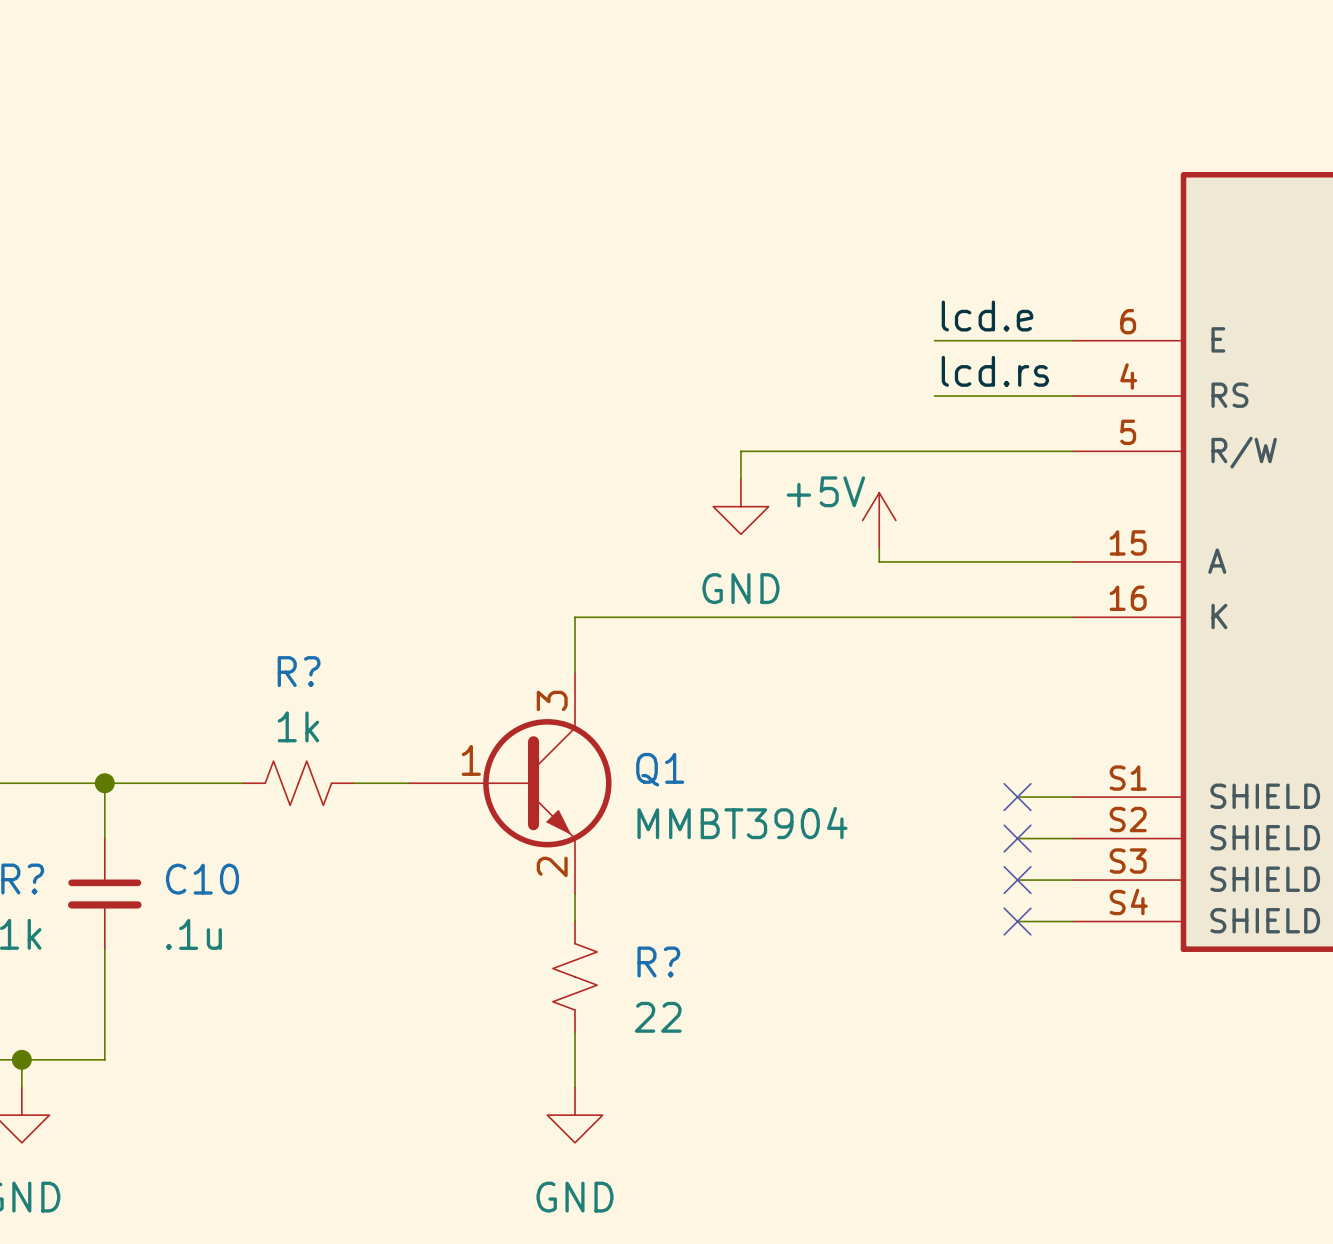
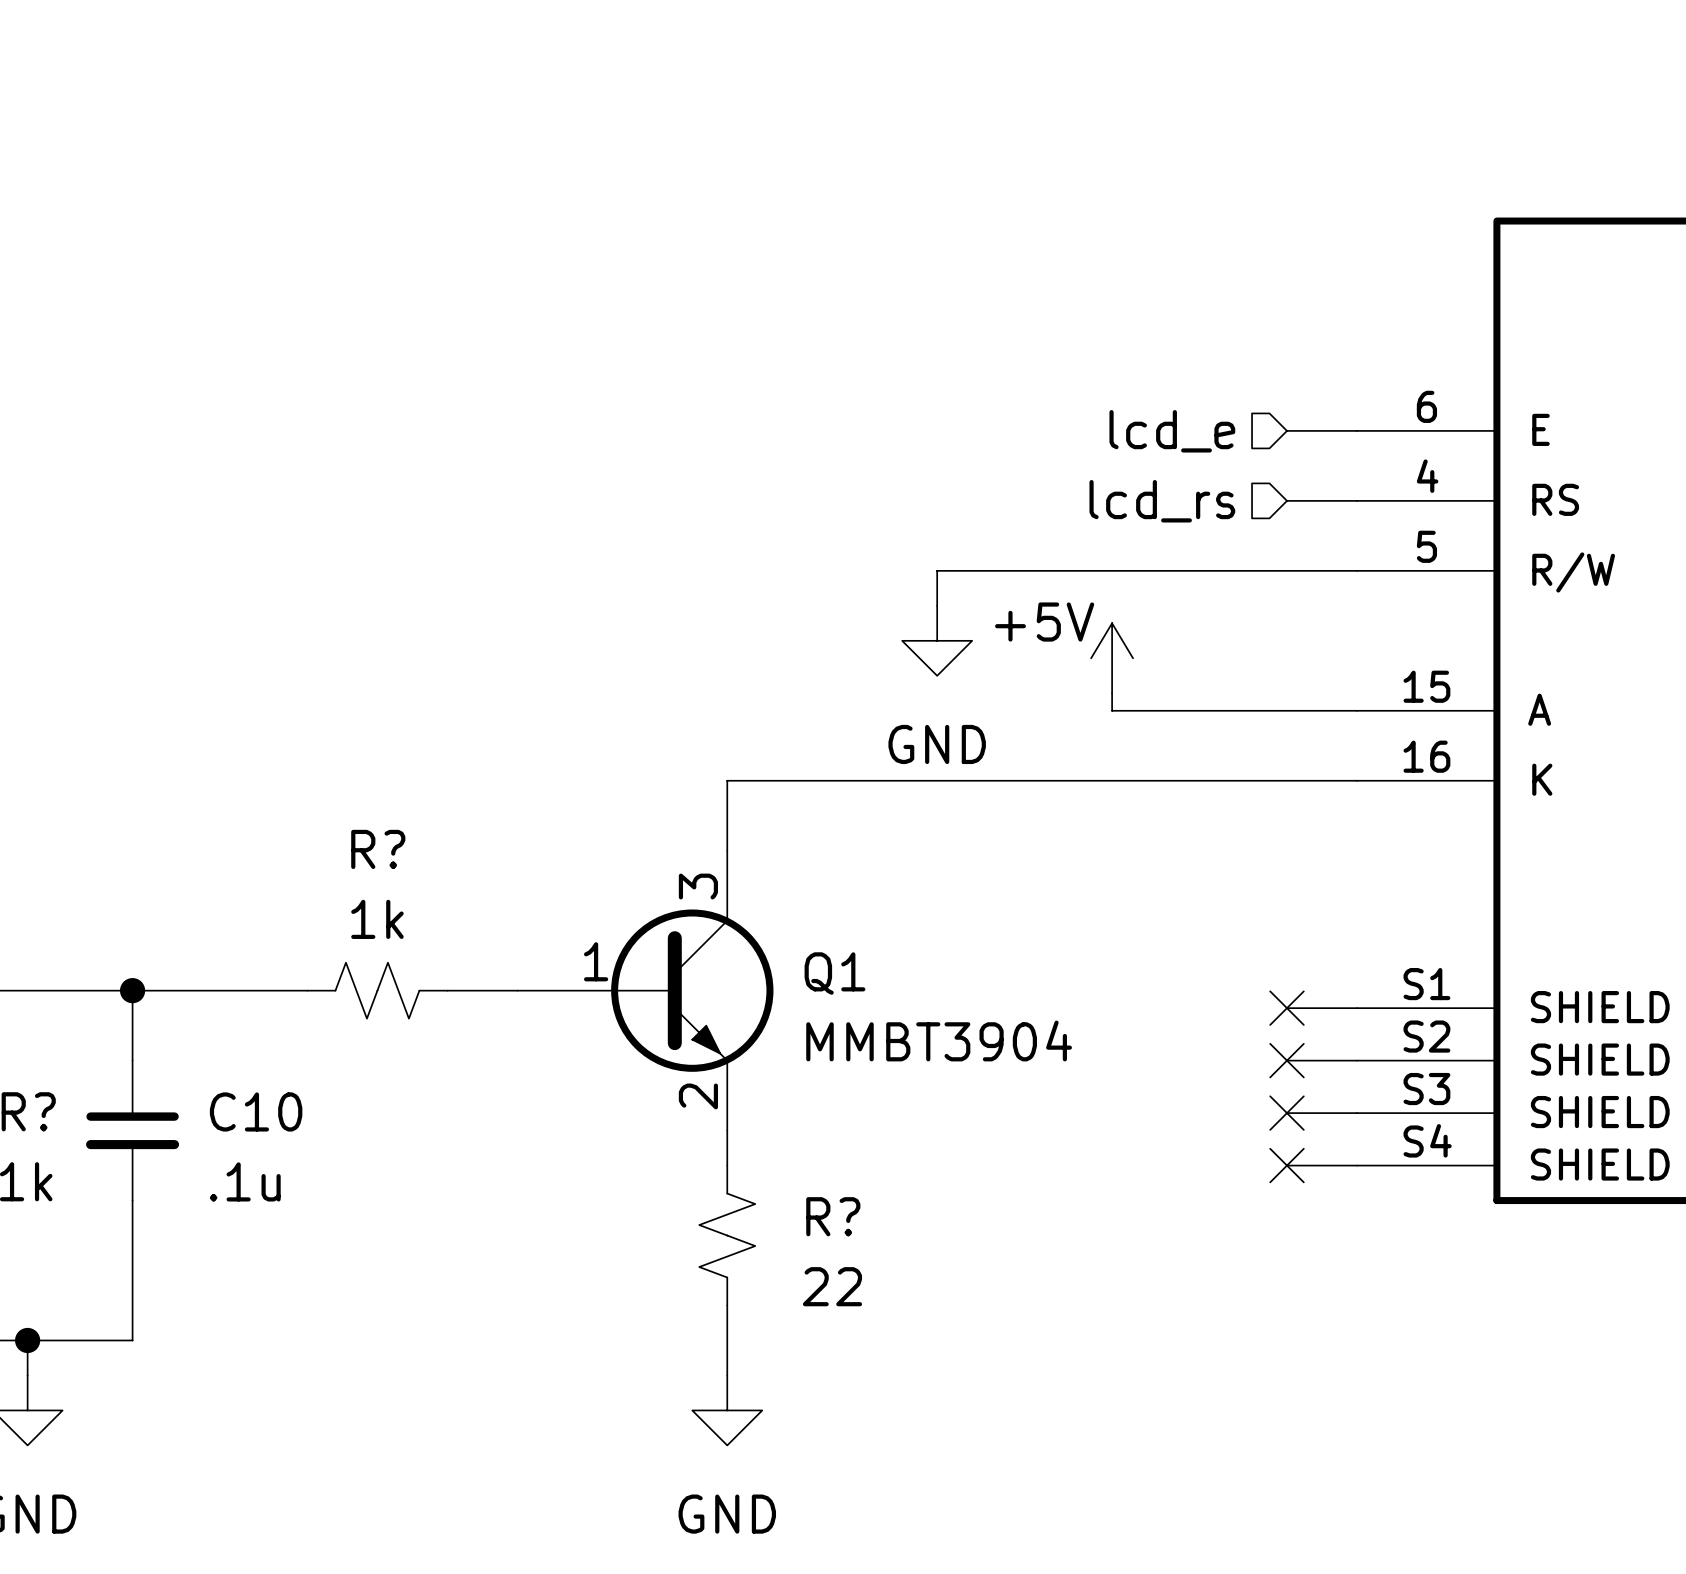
label: lcd.e (987, 316) -> none
hierarchical label: none -> lcd_e (1172, 431)
wire: (934, 340) (1017, 340) -> none
label: lcd.rs (995, 371) -> none
hierarchical label: none -> lcd_rs (1162, 501)
wire: (934, 396) (1017, 396) -> none

